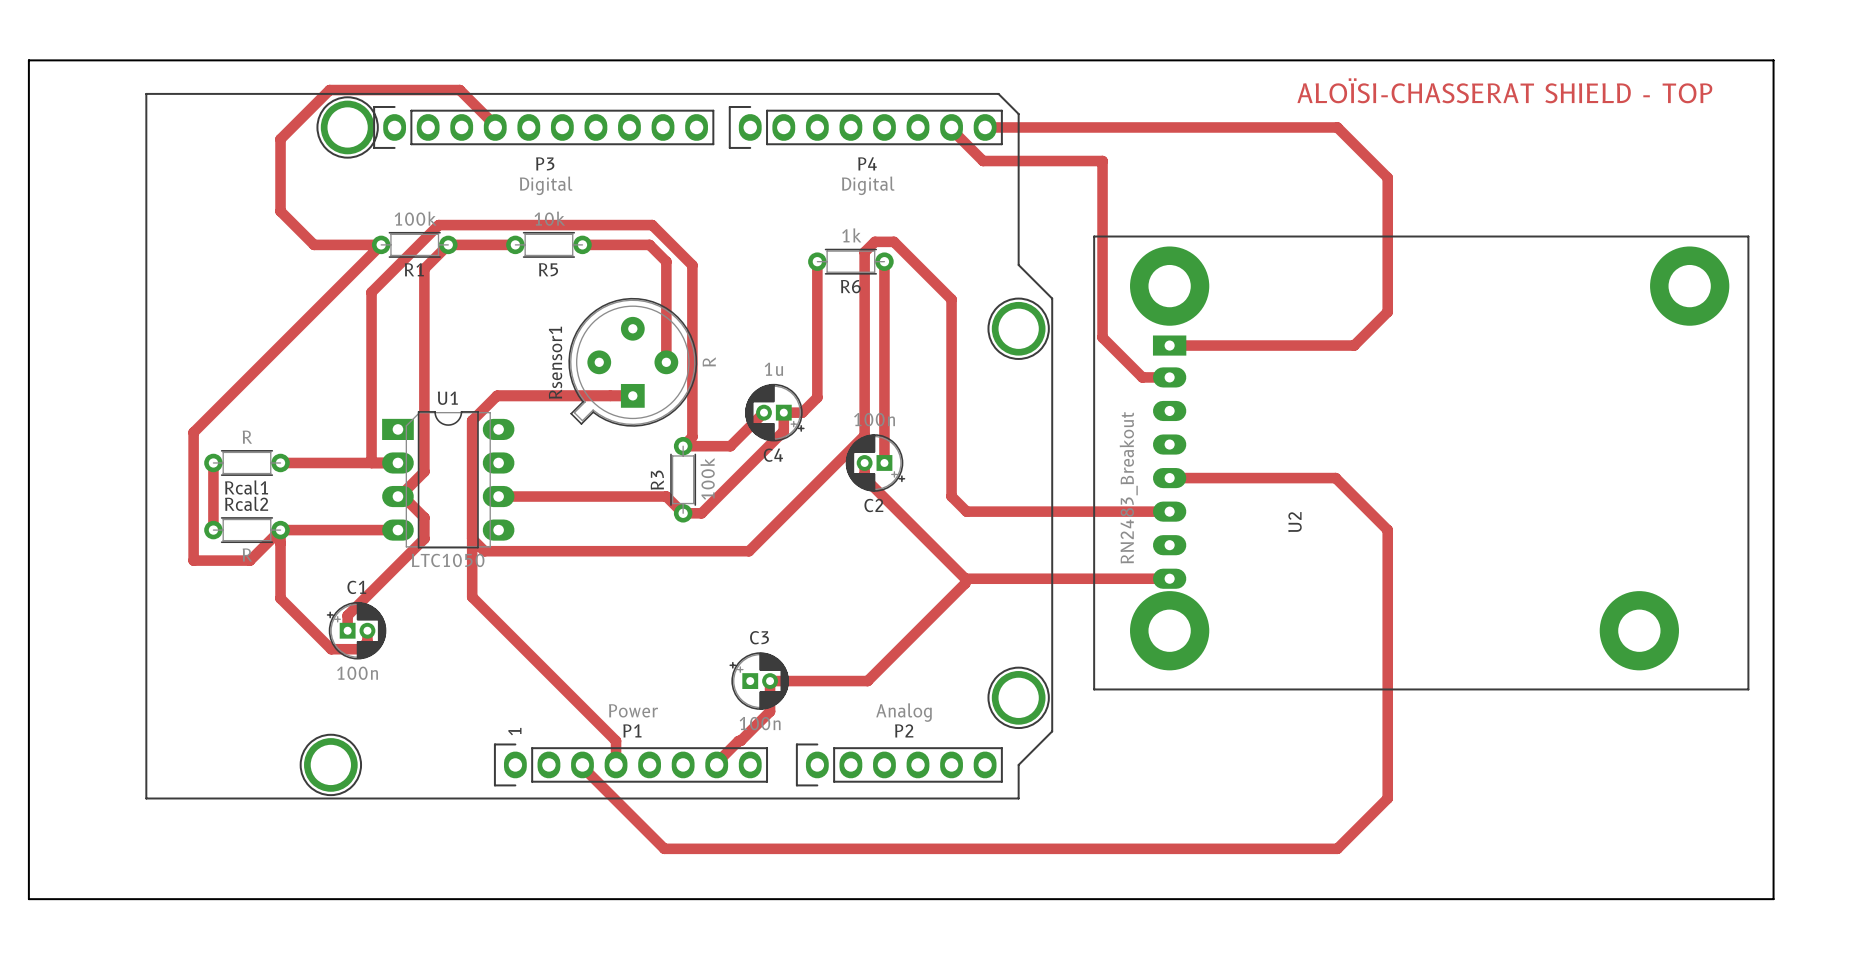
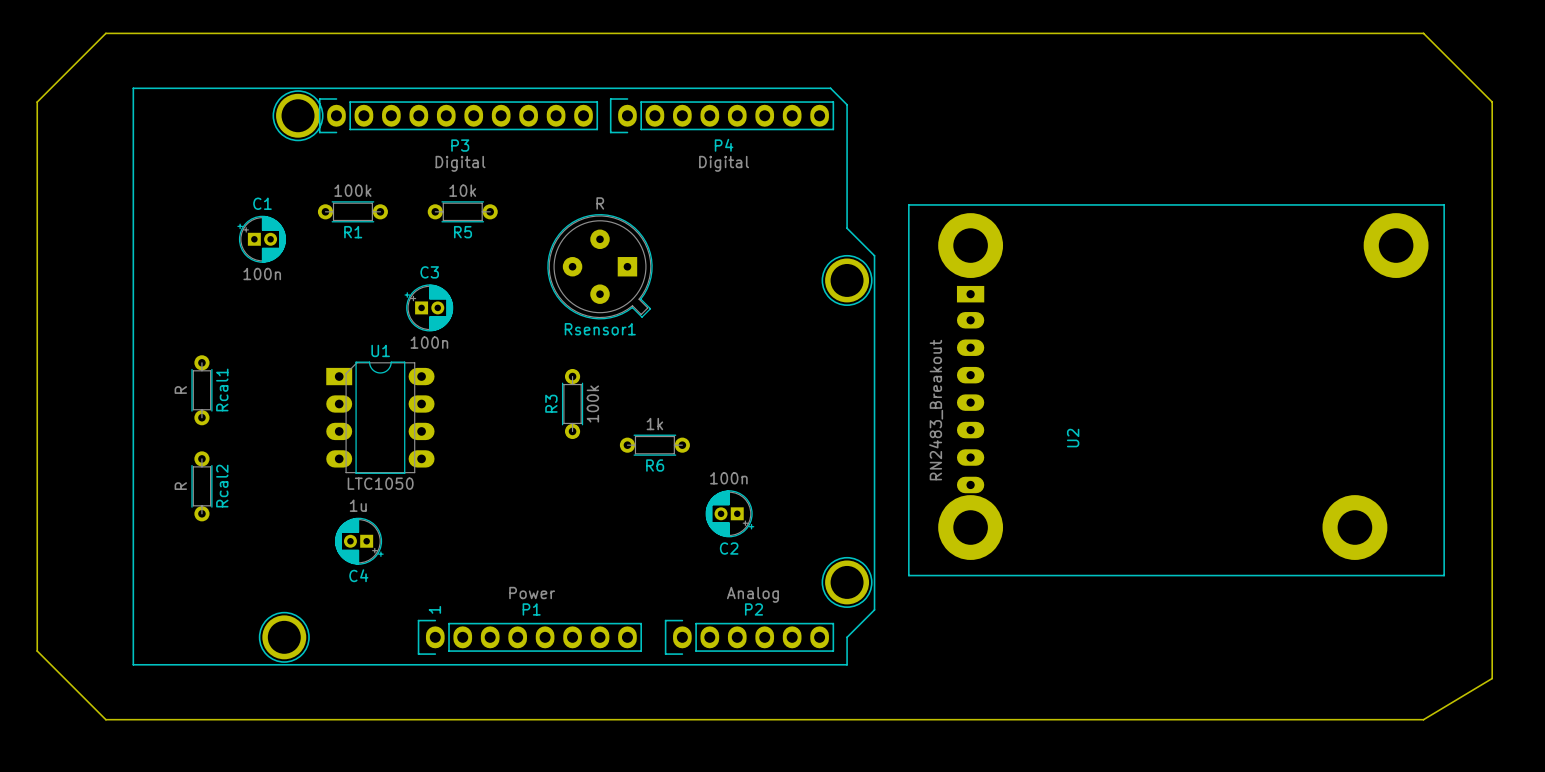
text: ALOÏSI-CHASSERAT SHIELD - TOP (1504, 90) -> none
board edge: (28, 110) (28, 60) (1773, 60) (1773, 899) (28, 899) (28, 781) -> (37, 102) (105, 33) (1423, 33) (1492, 102) (1492, 678) (1423, 719) (105, 719) (37, 651)
track: (495, 125) (459, 90) (329, 90) (280, 139) (280, 211) (314, 244) (381, 244) (193, 432) (193, 560) (250, 560) (280, 530) -> none
track: (985, 127) (1337, 127) (1387, 177) (1387, 312) (1354, 345) (1169, 345) -> none
track: (951, 129) (983, 161) (1102, 161) (1102, 337) (1142, 377) (1169, 377) -> none
track: (515, 244) (448, 244) (424, 268) (424, 471) (399, 496) -> none
track: (582, 244) (649, 244) (666, 261) (666, 362) -> none
track: (817, 261) (817, 397) (802, 412) (783, 412) (783, 431) (701, 513) (683, 513) (666, 496) (498, 496) -> none
R6 position: (850, 261) -> (654, 445)
track: (884, 261) (884, 462) -> none
Rsensor1 rotation: 0° (632, 362) -> 90° counterclockwise (600, 266)
Rsensor1 position: (632, 362) -> (600, 266)
track: (632, 395) (496, 395) (472, 420) (472, 597) (616, 740) (616, 764) -> none
track: (763, 412) (730, 446) (683, 446) (692, 436) (692, 265) (652, 225) (438, 225) (371, 292) (371, 462) -> none
C4 position: (774, 412) -> (359, 541)
Rcal1 value position: R (247, 437) -> R (180, 390)
track: (213, 462) (213, 530) -> none
Rcal1 rotation: 0° (246, 462) -> 90° clockwise (201, 390)
track: (280, 462) (397, 462) -> none
track: (864, 462) (864, 478) (965, 578) -> none
C2 position: (875, 462) -> (729, 513)
track: (1169, 478) (1335, 478) (1387, 530) (1387, 798) (1337, 848) (664, 848) (582, 766) -> none
U1 position: (448, 479) -> (380, 417)
Rcal1 name position: Rcal1 (246, 487) -> Rcal1 (222, 390)
track: (397, 496) (403, 496) (424, 517) (424, 538) (347, 615) (347, 630) -> none
track: (1169, 511) (966, 511) (951, 496) (951, 299) (893, 241) (874, 241) (864, 252) (864, 435) (749, 551) (484, 551) (472, 538) -> none
Rcal2 rotation: 0° (246, 530) -> 90° clockwise (201, 486)
Rcal2 position: (246, 530) -> (201, 486)
track: (280, 530) (280, 598) (331, 649) (360, 649) (367, 641) (367, 630) -> none
track: (280, 530) (397, 530) -> none
track: (965, 578) (1169, 578) -> none
track: (965, 578) (965, 583) (867, 681) (770, 681) (770, 711) (716, 762) -> none
C1 position: (356, 630) -> (261, 239)
C3 position: (759, 681) -> (428, 307)

